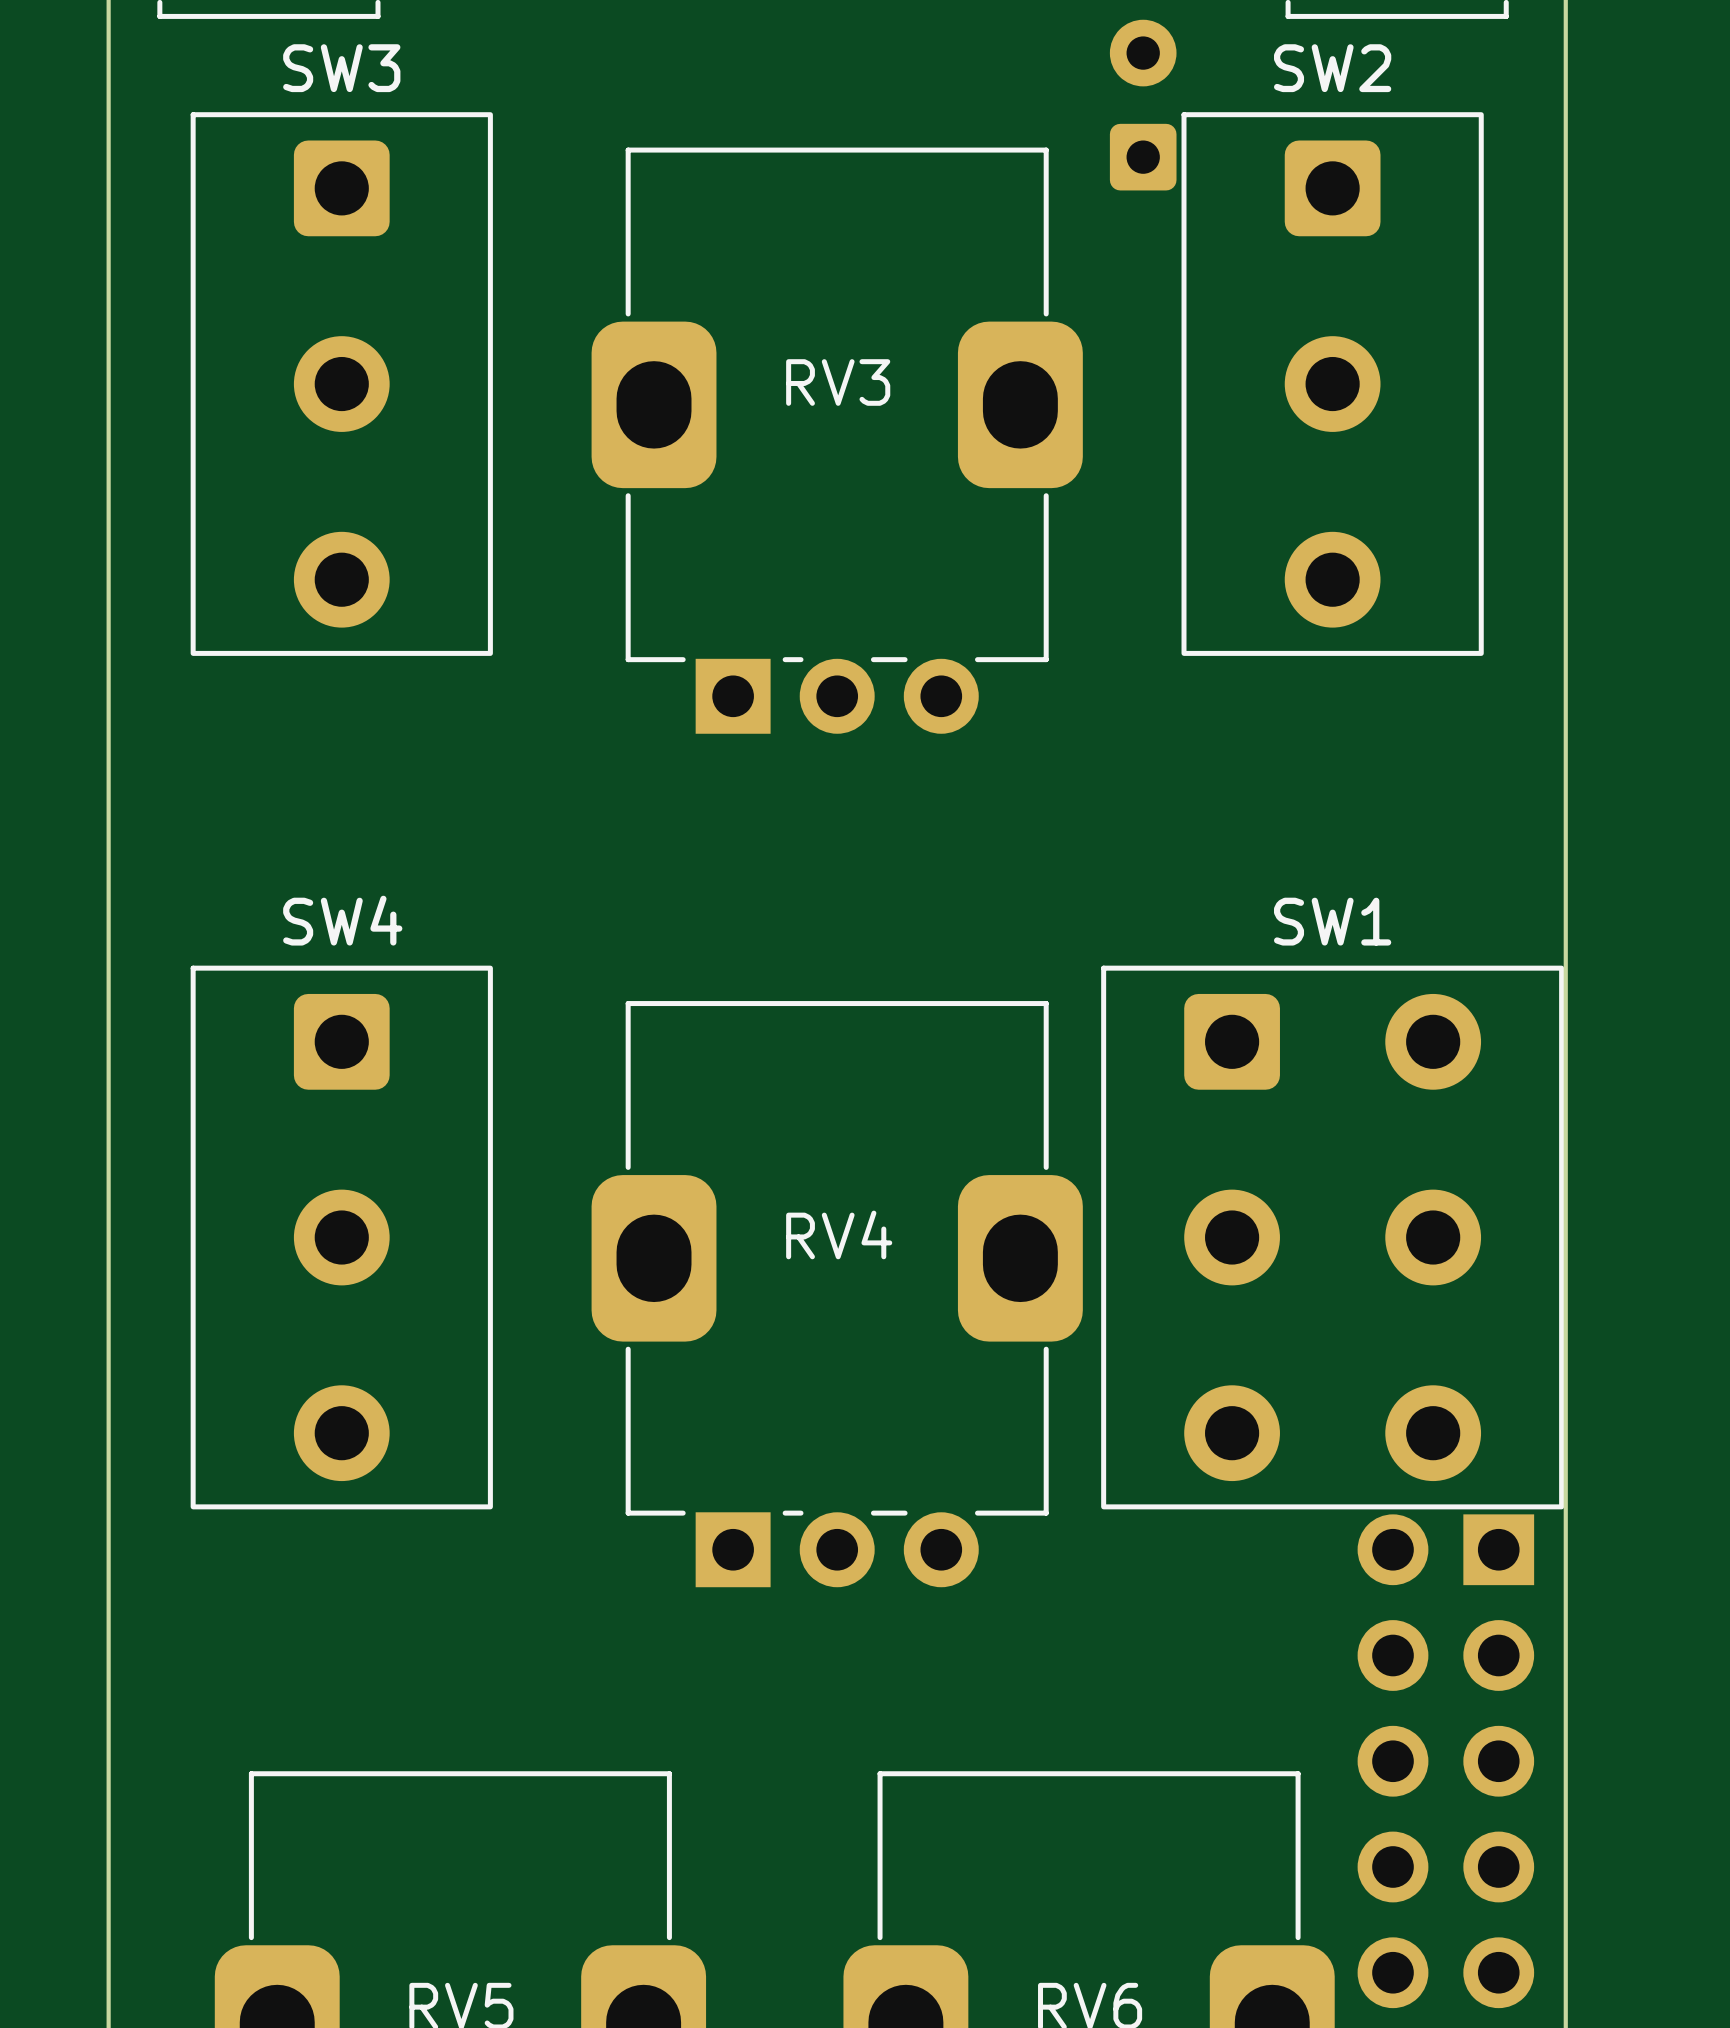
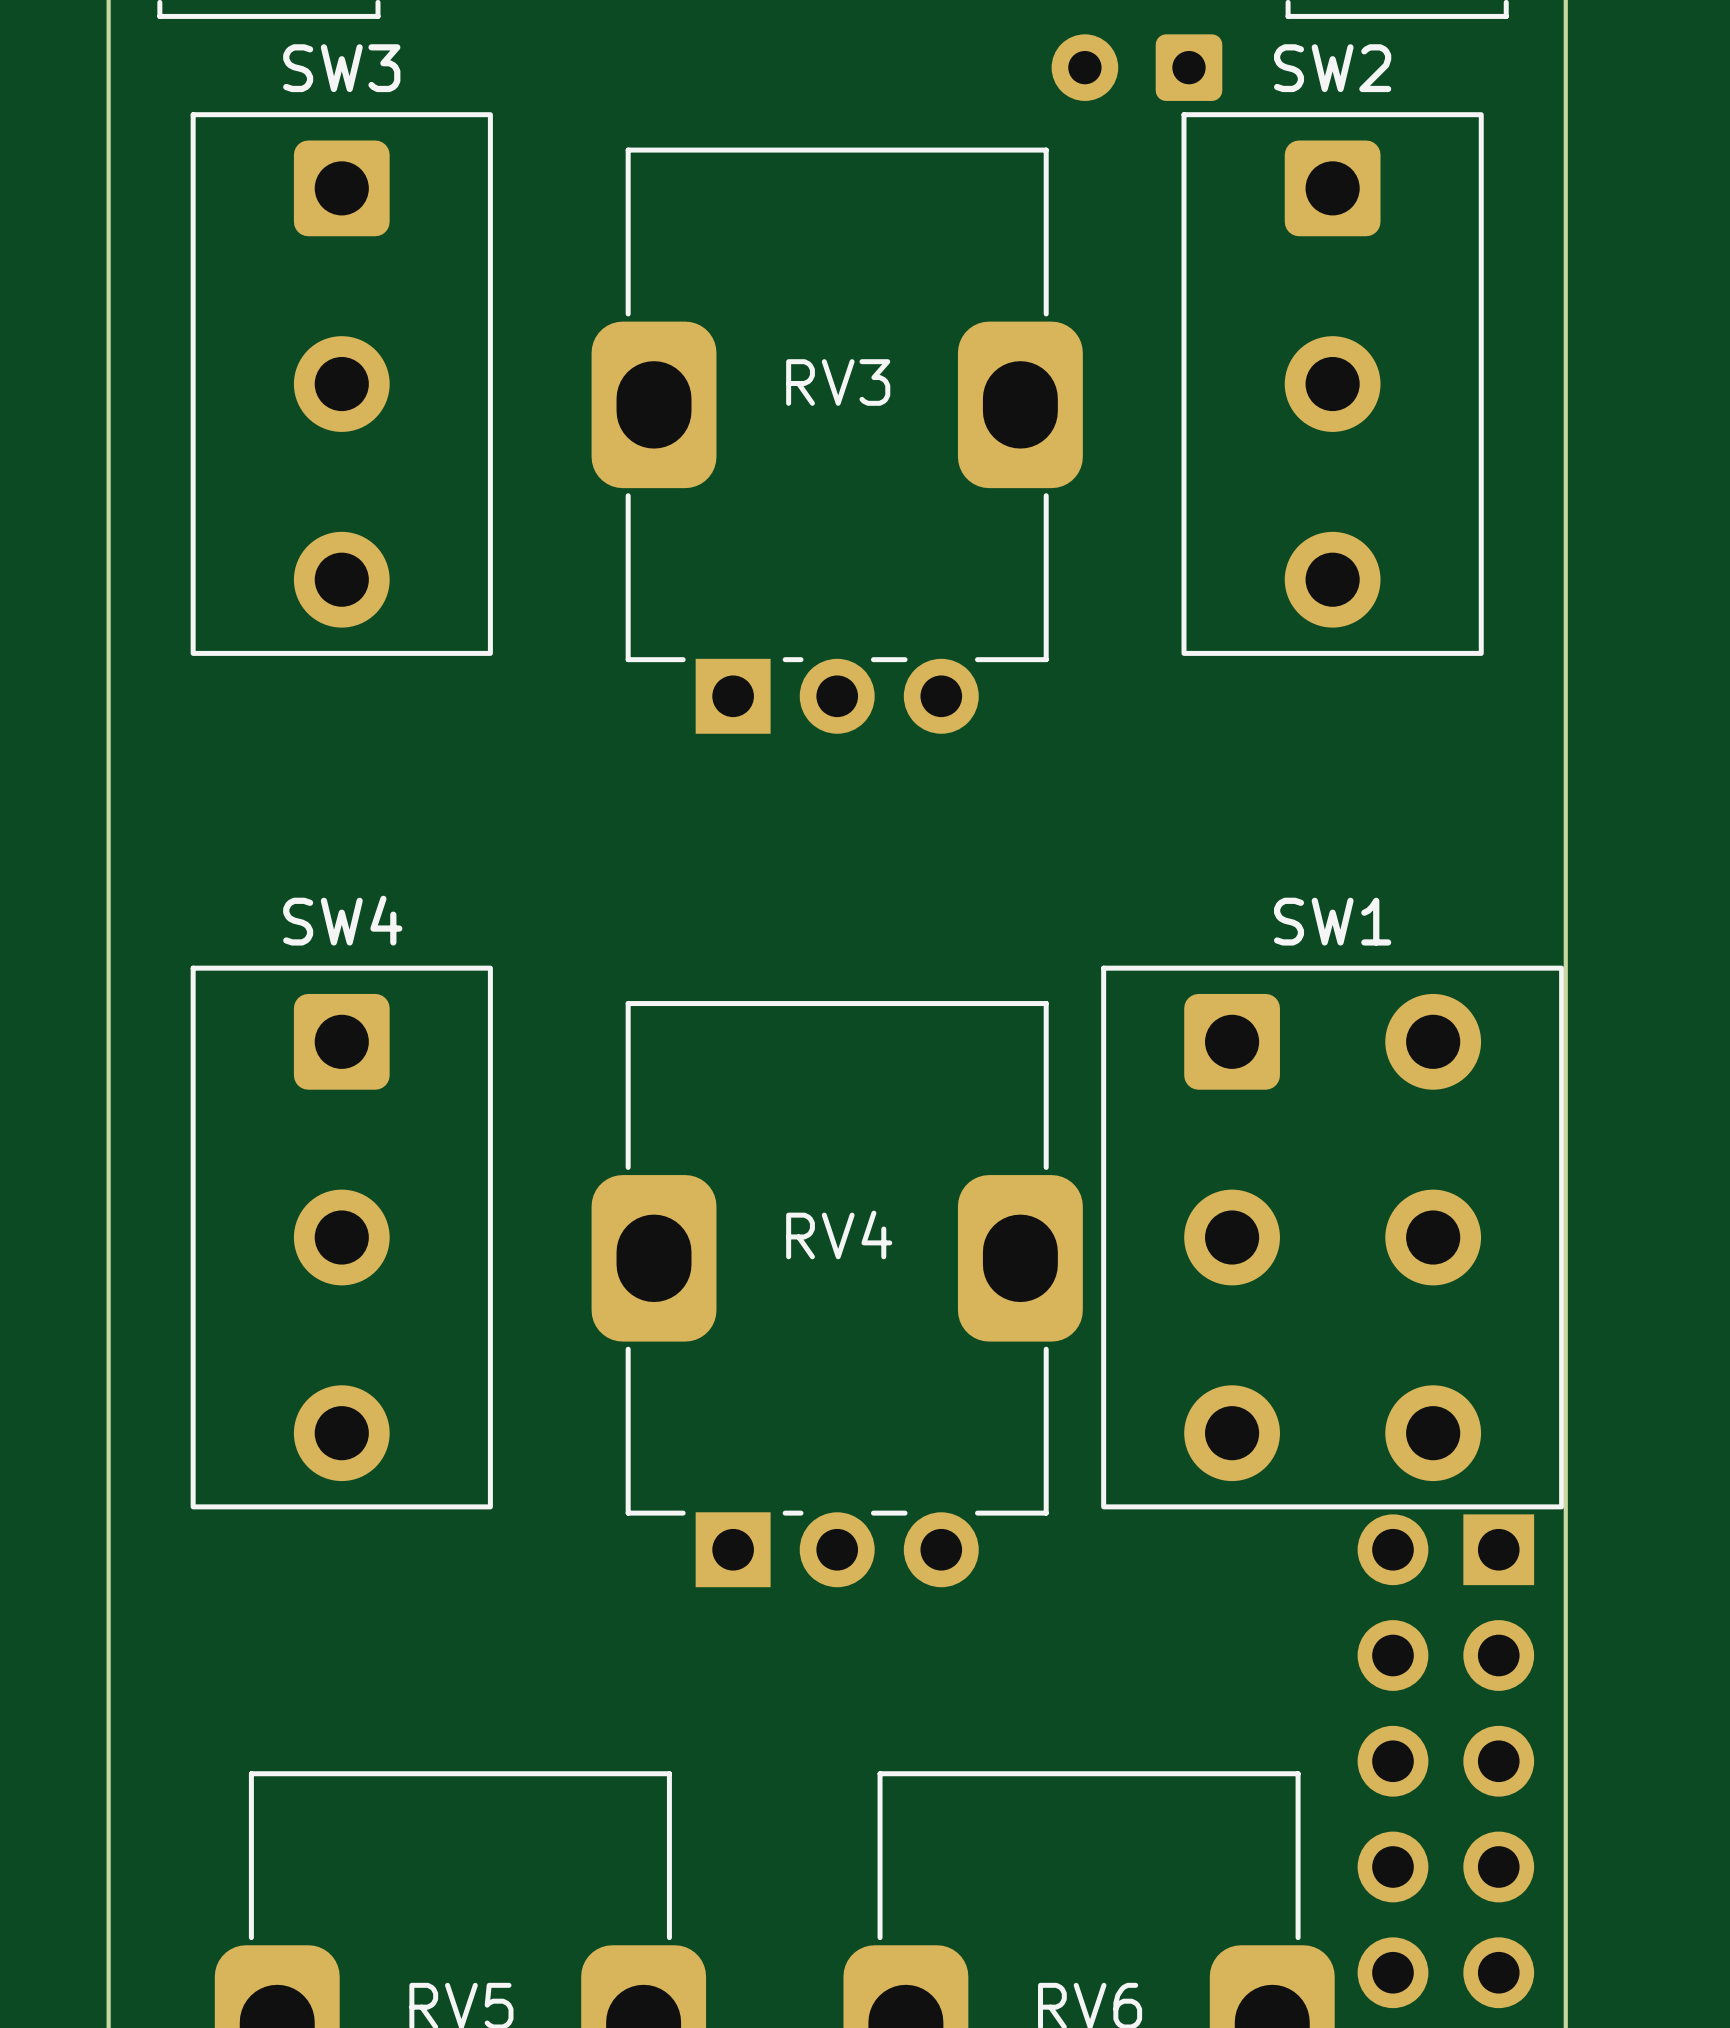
part rotation: 0° (1143, 105) -> 90° counterclockwise (1136, 67)

